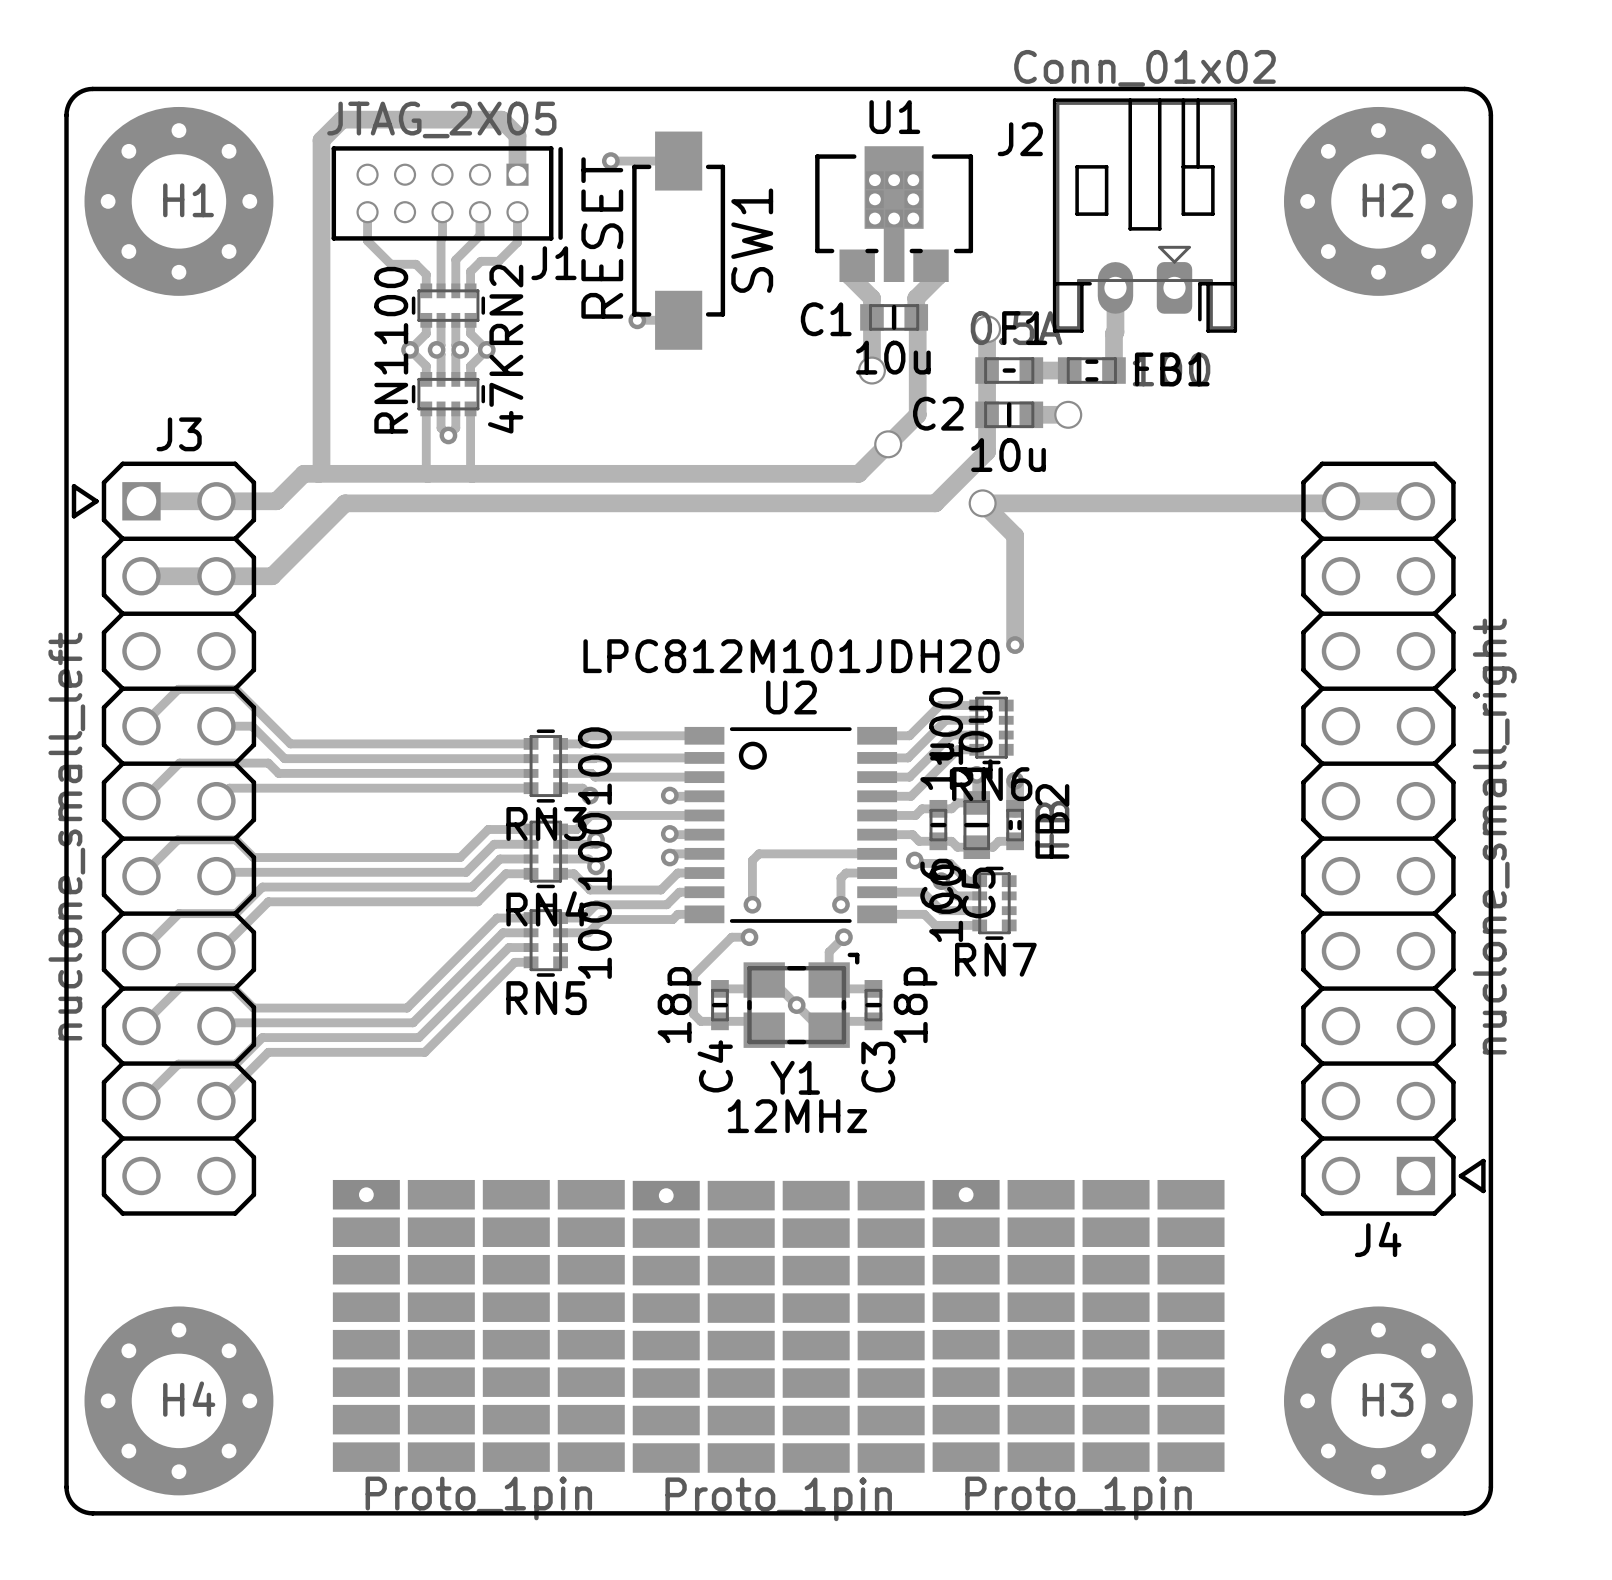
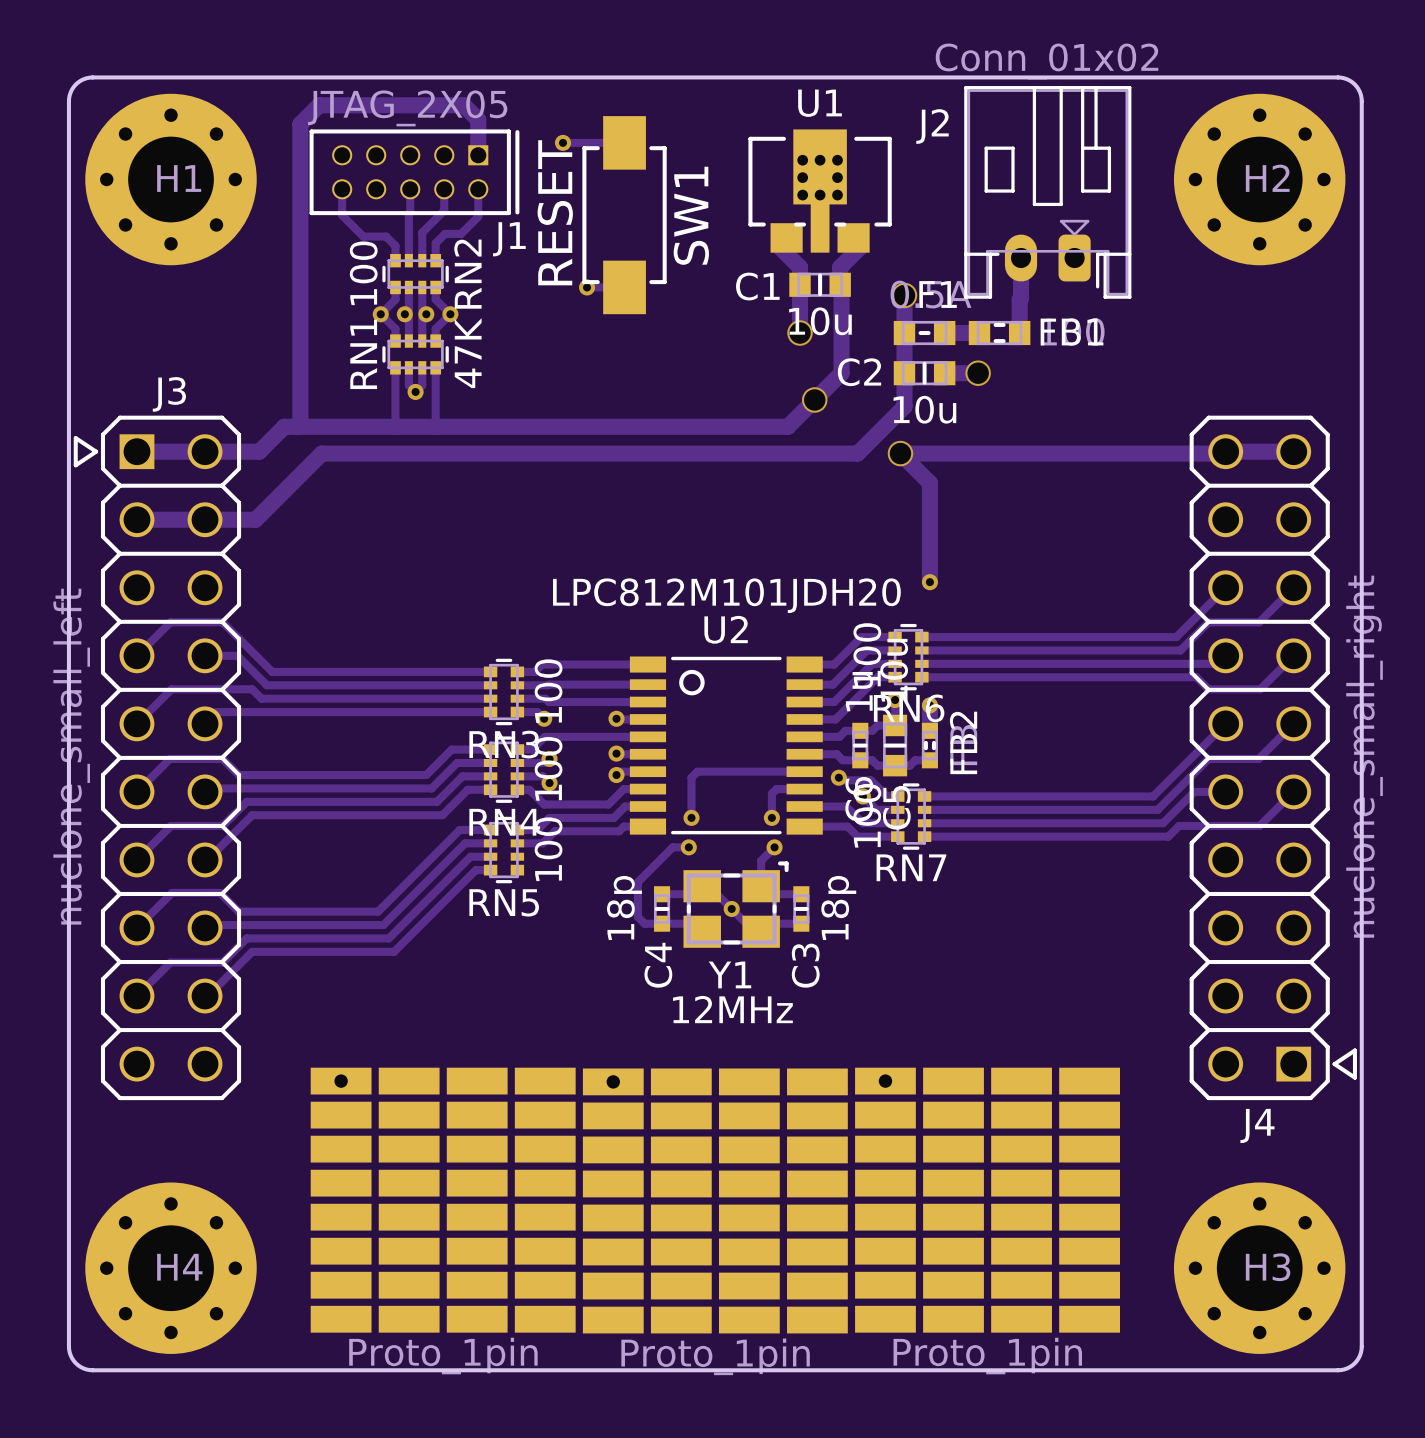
track: none -> (1225, 587) (1176, 637) (921, 637)
track: none -> (1293, 587) (1259, 622) (1208, 622) (1180, 650) (921, 650)
track: none -> (1225, 655) (1217, 663) (921, 663)
track: none -> (1293, 655) (1260, 689) (1208, 689) (1196, 677) (921, 677)
track: none -> (1225, 723) (1153, 796) (924, 796)
track: none -> (1293, 723) (1258, 758) (1208, 758) (1157, 809) (924, 809)
track: none -> (1225, 791) (1194, 791) (1163, 823) (924, 823)
track: none -> (1293, 791) (1259, 825) (1179, 825) (1168, 836) (924, 836)

